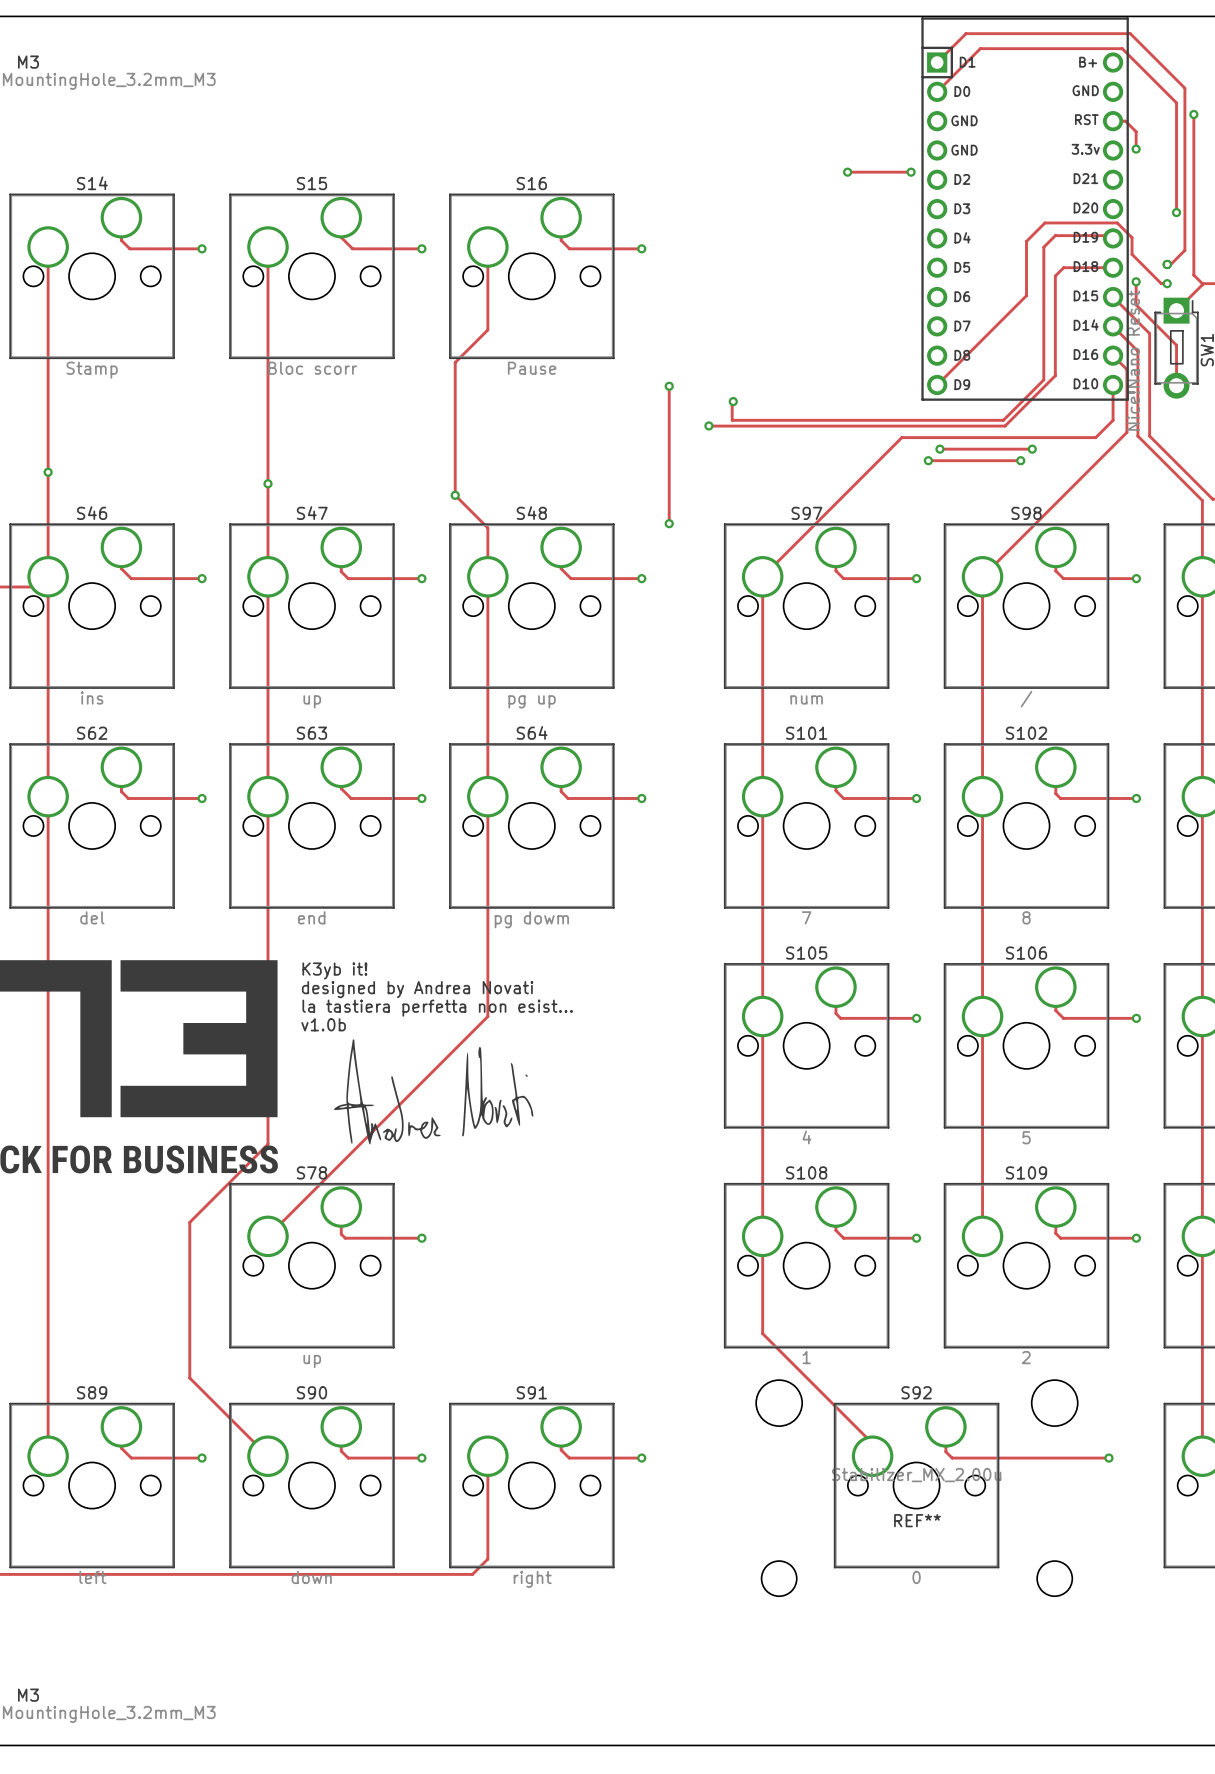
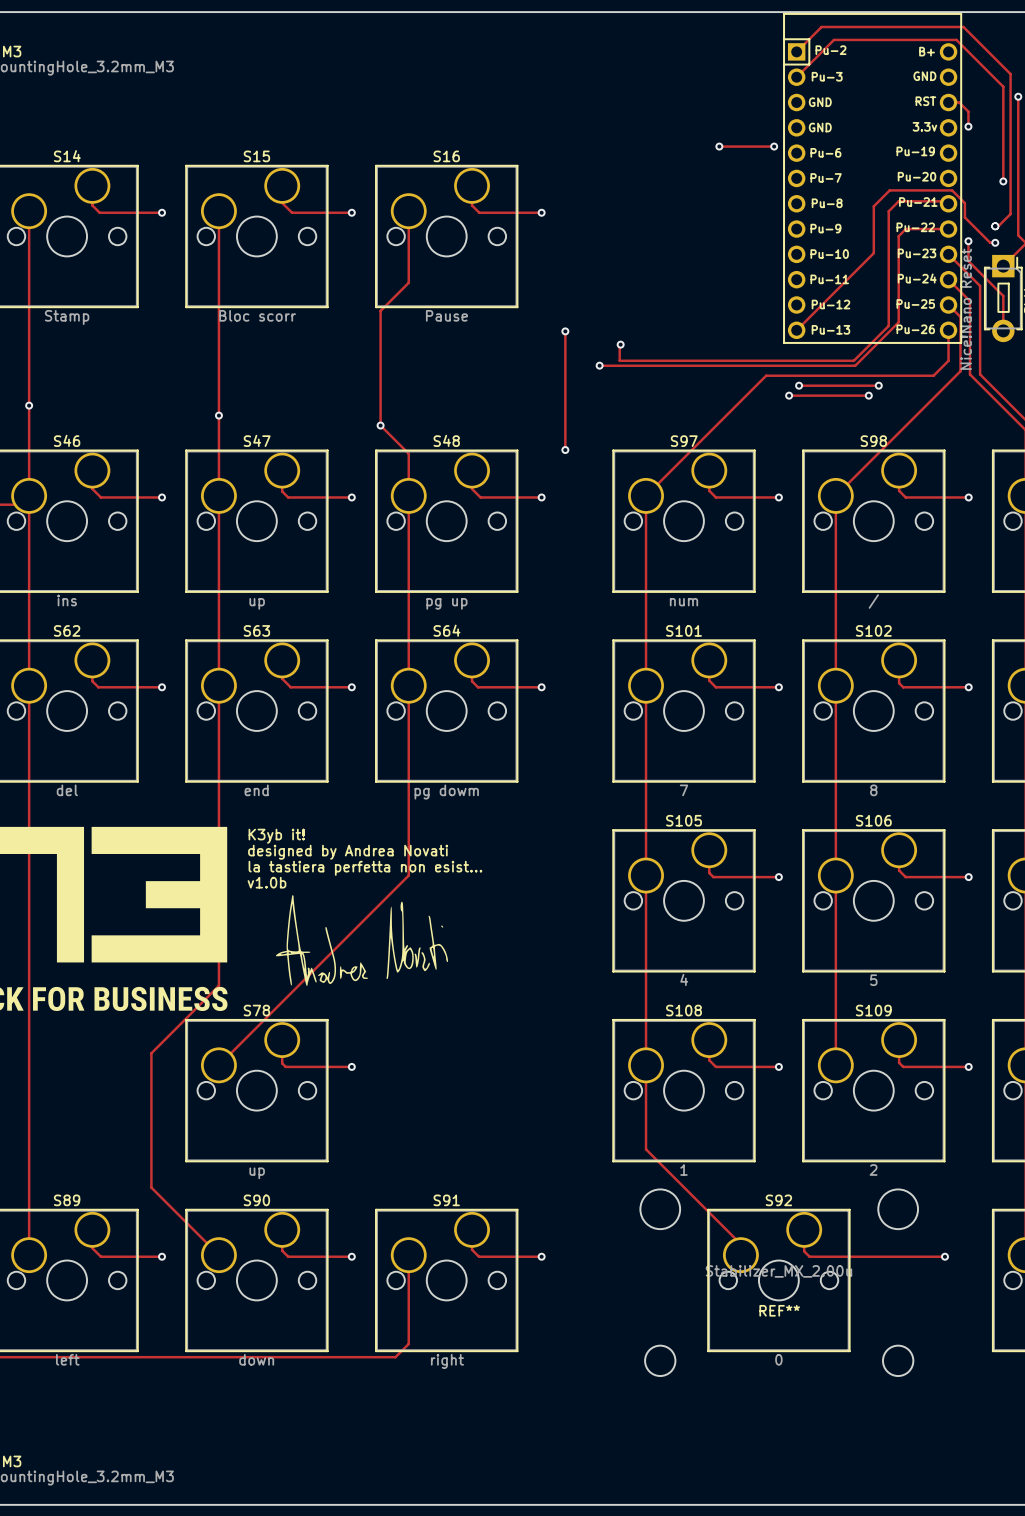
part footprint: [921, 17, 1129, 401] -> [783, 12, 963, 344]

